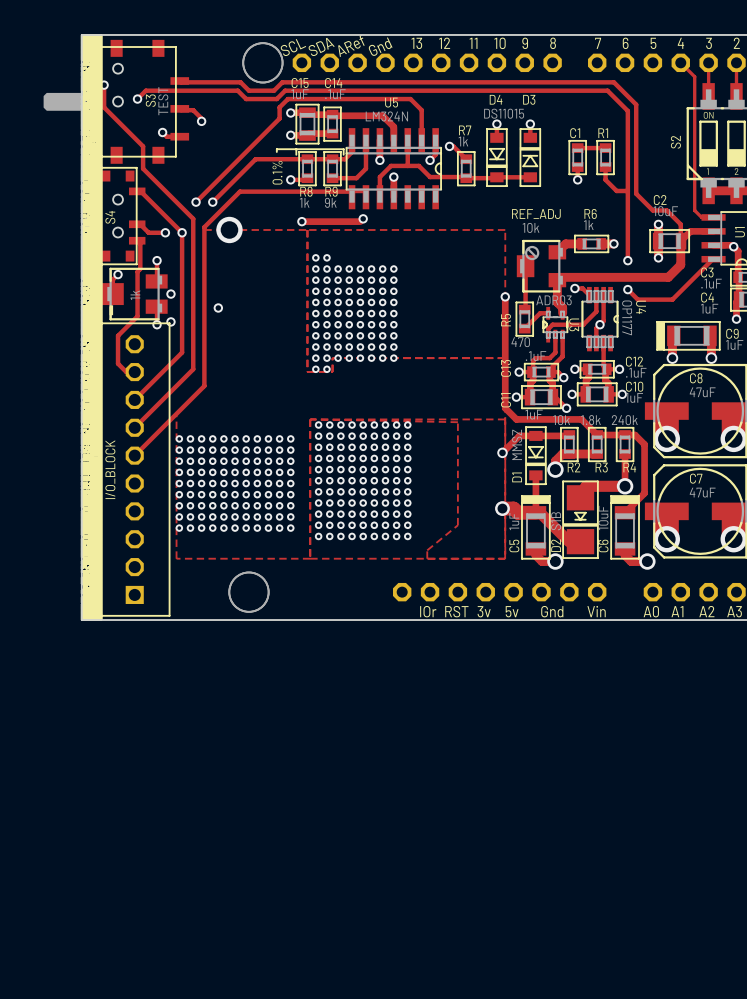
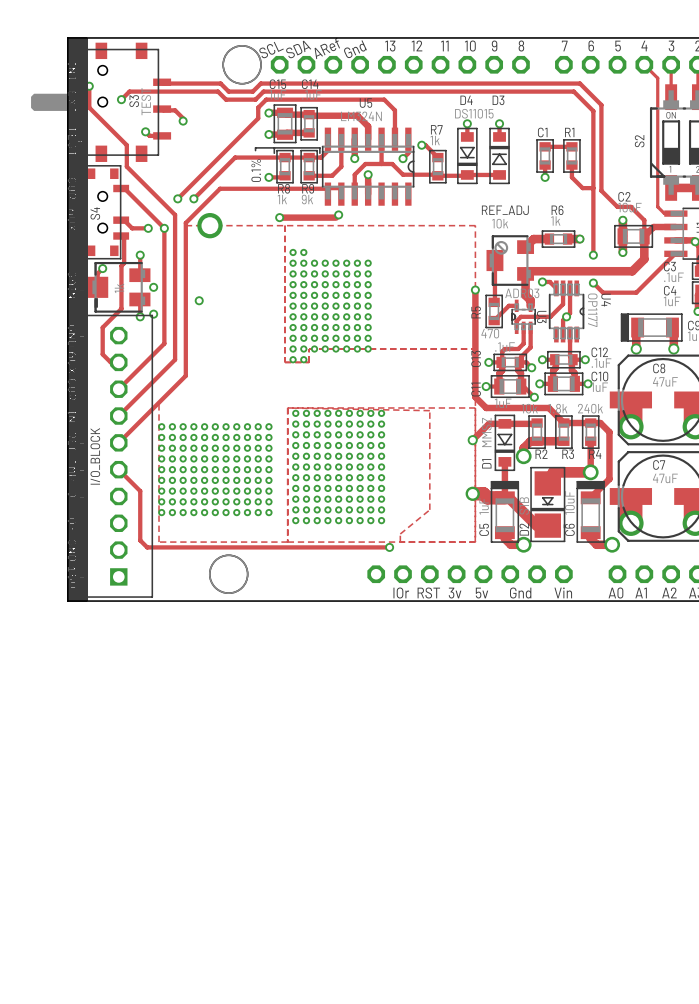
track: none -> (118, 469) (140, 491) (140, 540) (147, 547) (389, 547)
via: none -> (389, 547)

